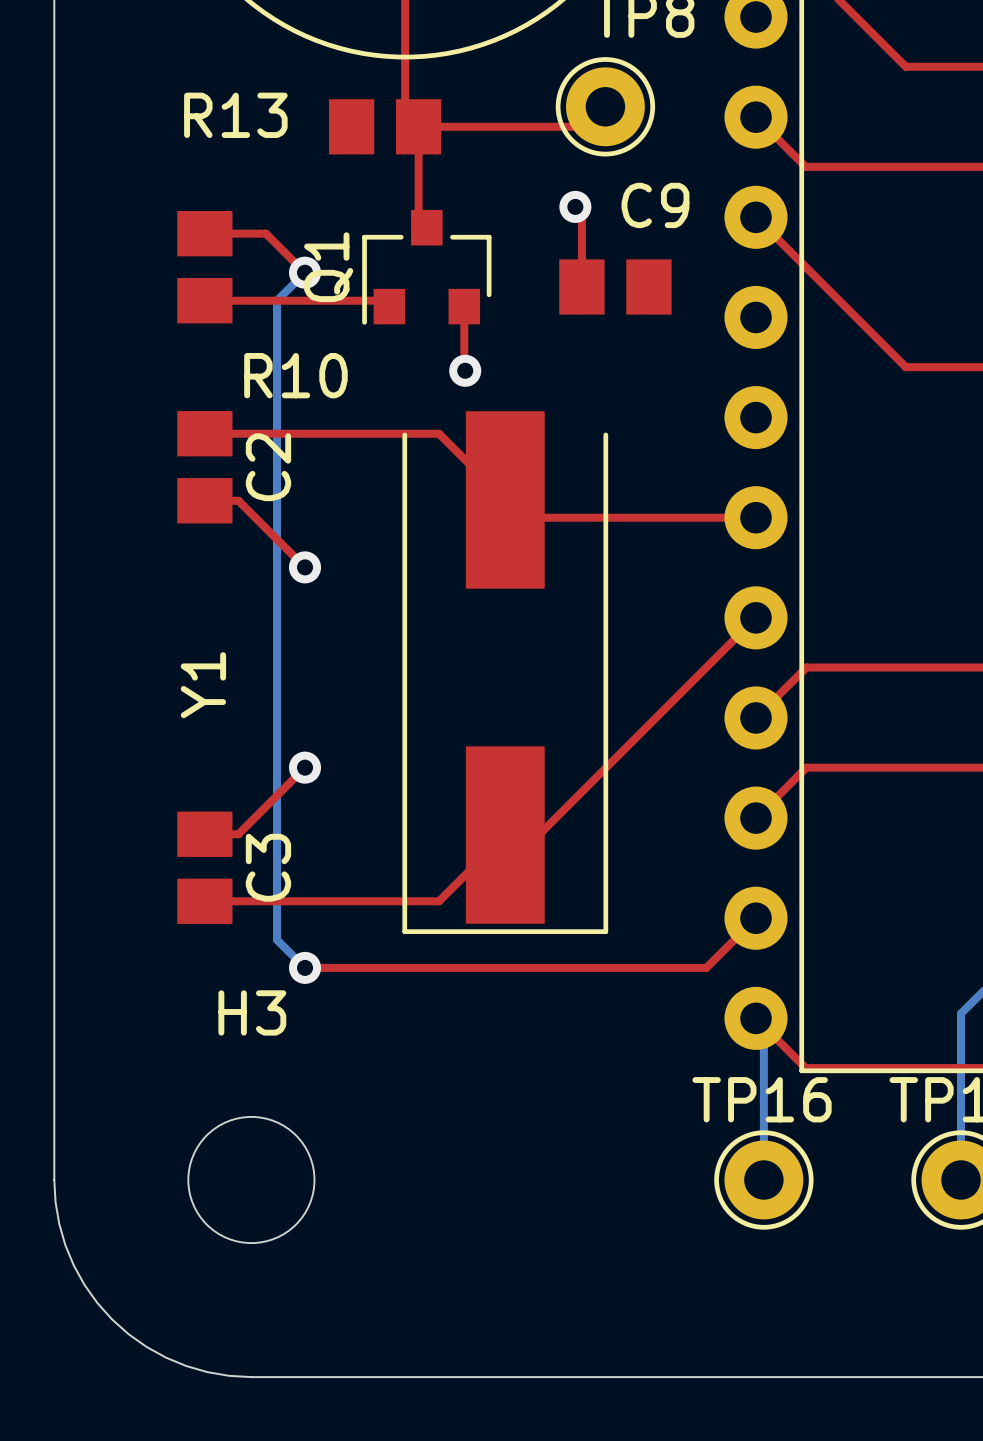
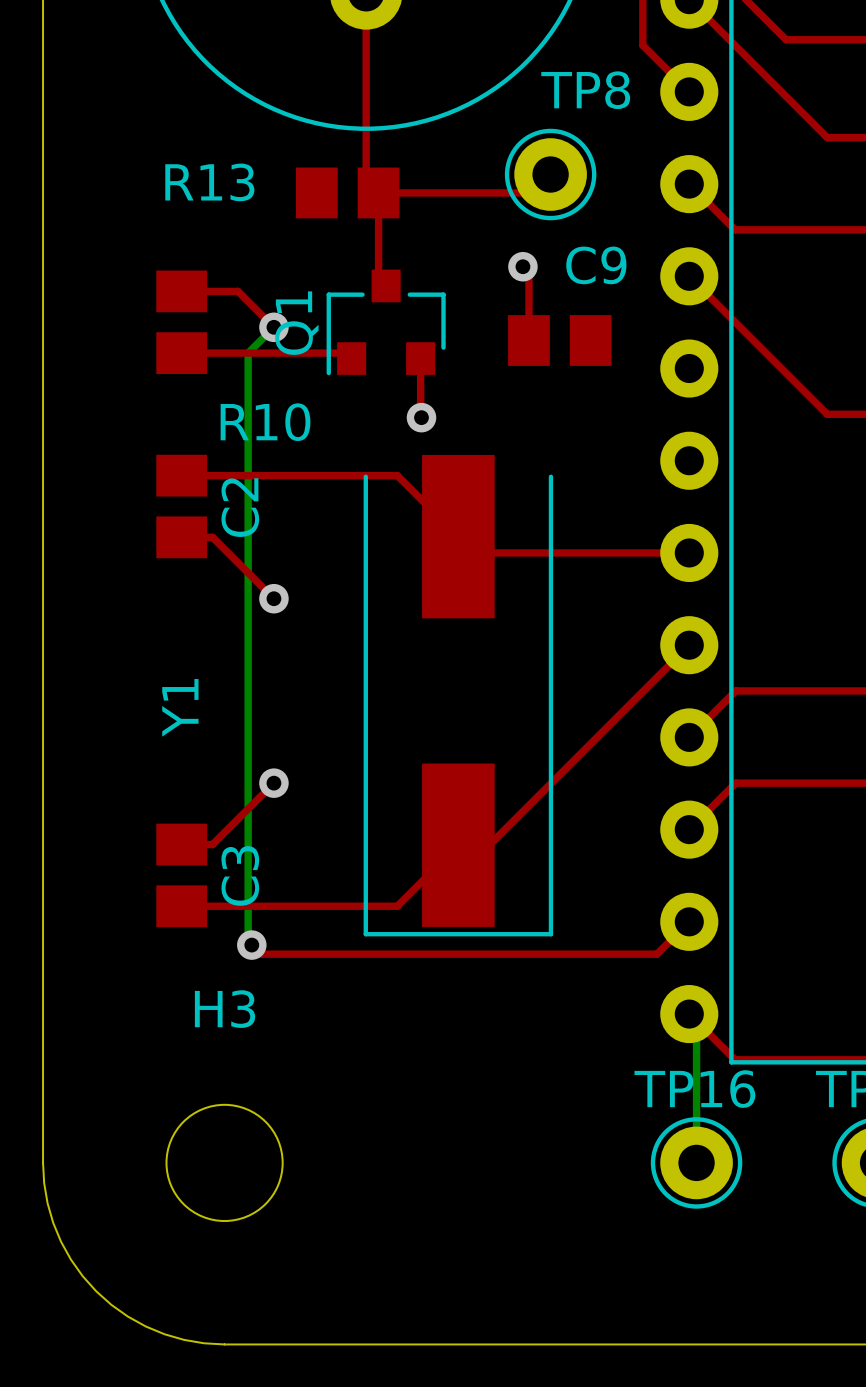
top track: (720, 953) (706, 967) (305, 967) -> (656, 954) (260, 954) (251, 945)
via position: (305, 967) -> (251, 945)

